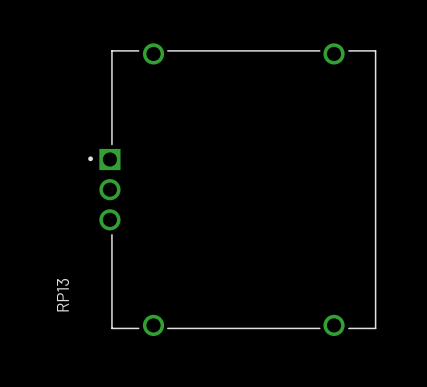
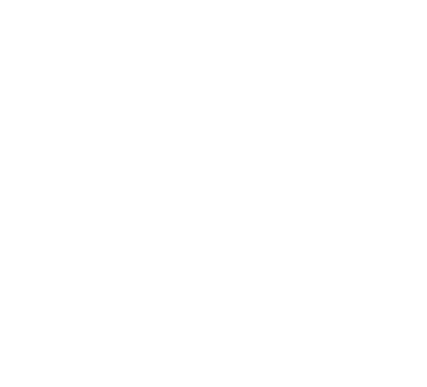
RP13: (232, 189) -> none

